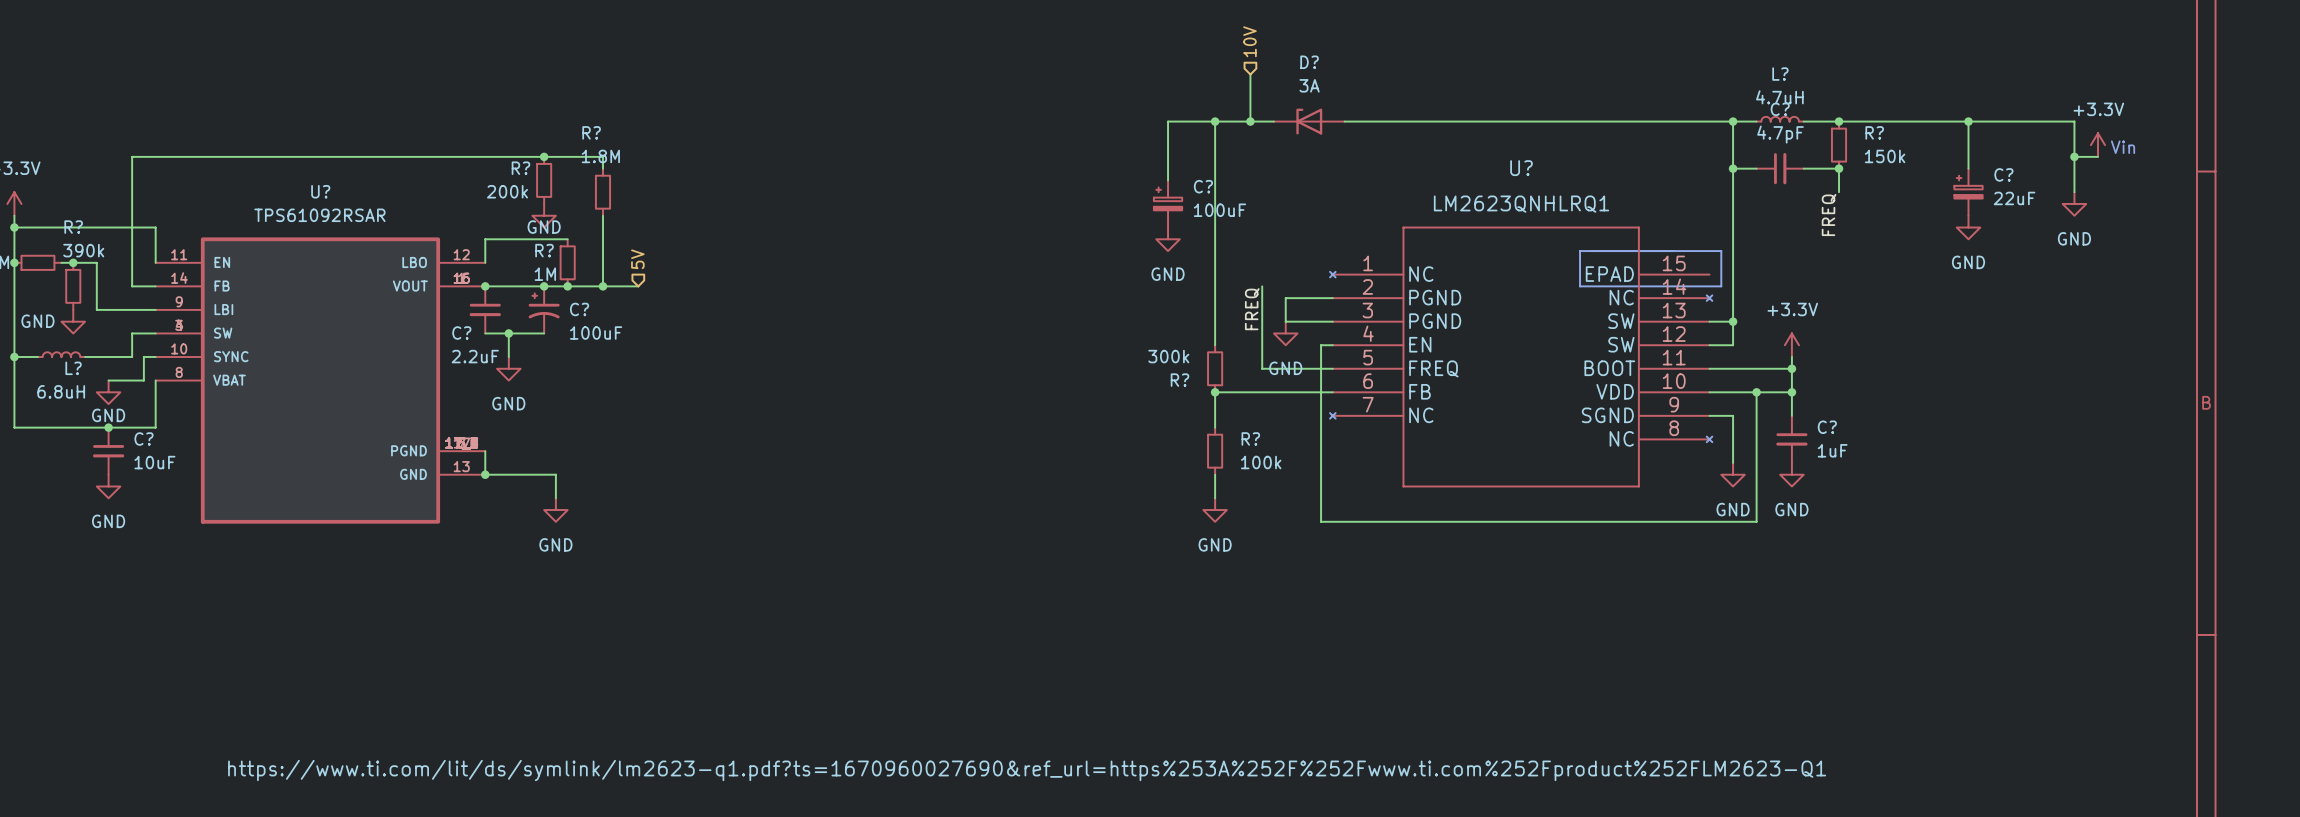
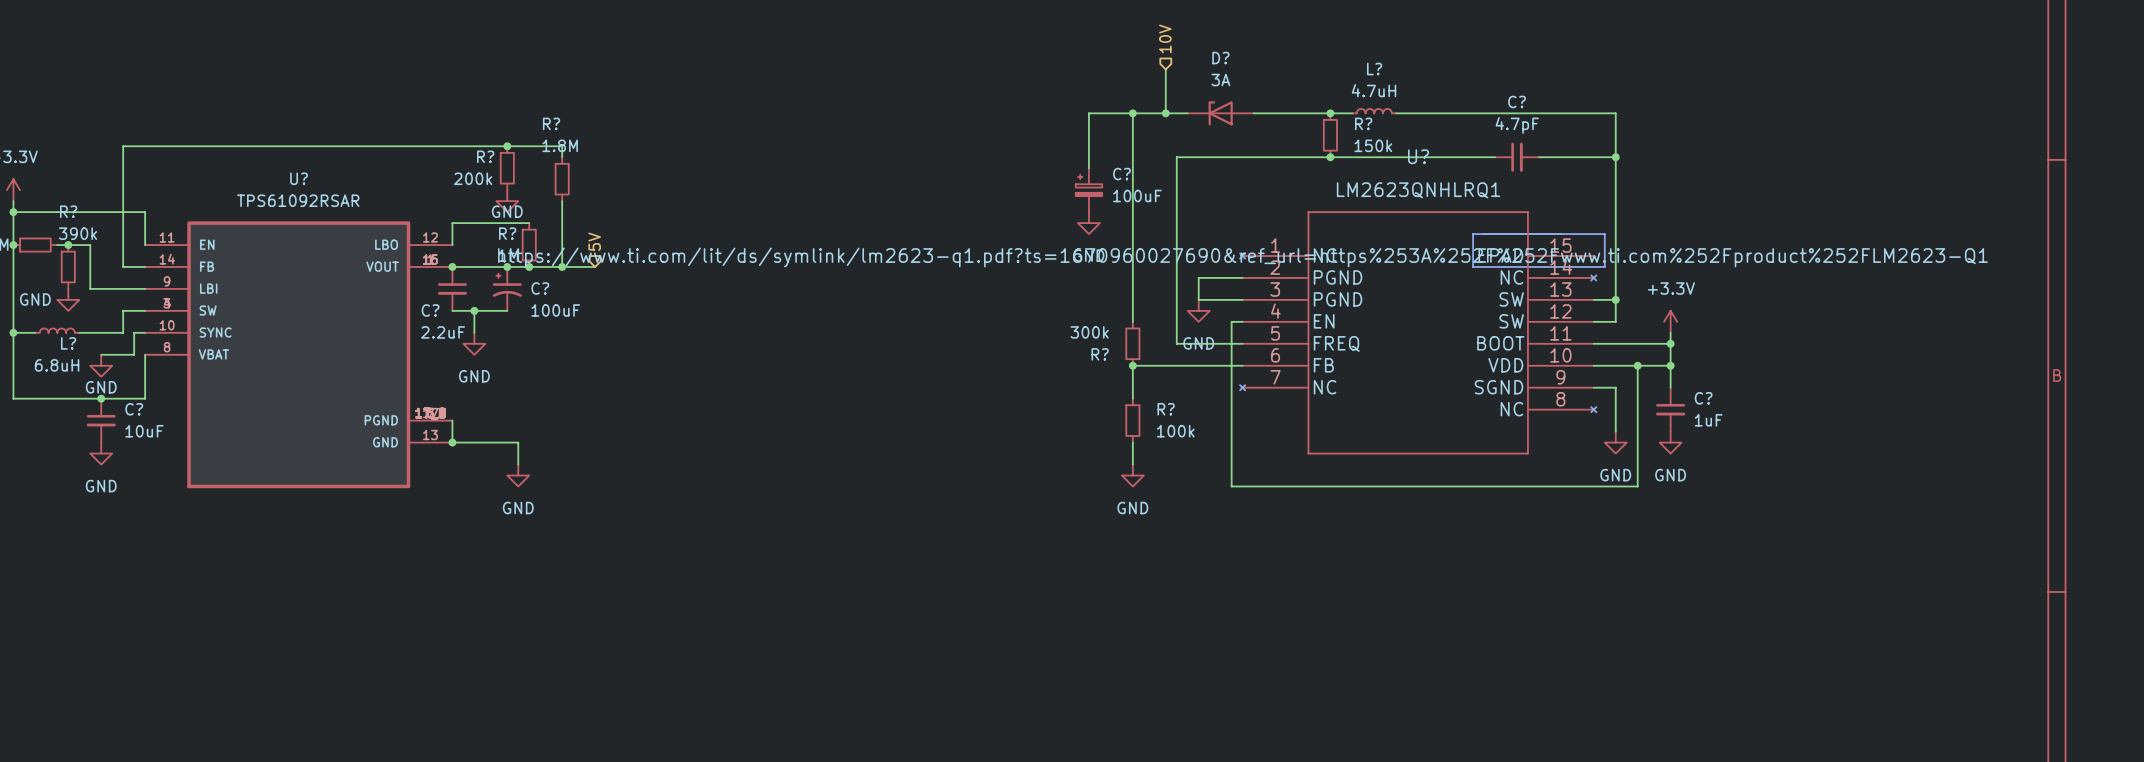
L?: none -> 4.7uH (1374, 111)
L?: 4.7uH (1780, 119) -> none
junction: none -> (1330, 113)
wire: (1450, 121) (1497, 121) -> none
wire: (1733, 121) (1756, 121) -> none
junction: (1733, 121) -> none
wire: (1803, 121) (2074, 121) (2074, 192) -> none
junction: (1839, 121) -> none
wire: (1968, 121) (1968, 168) -> none
junction: (1968, 121) -> none
R?: none -> 150k (1330, 135)
R?: 150k (1839, 145) -> none
power symbol: +3.3V (2097, 145) -> none
text: Vin (2123, 147) -> none
wire: (2074, 156) (2097, 156) -> none
junction: (2074, 156) -> none
junction: none -> (1330, 157)
wire: none -> (1495, 157) (1176, 157) (1176, 266)
wire: (1733, 168) (1756, 168) -> (1615, 157) (1538, 157)
C? position: (1780, 168) -> (1516, 157)
wire: (1803, 168) (1839, 168) (1839, 192) -> none
junction: (1839, 168) -> none
C?: 22uF (1968, 192) -> none
power symbol: GND (2074, 203) -> none
label: FREQ (1829, 214) -> none
power symbol: GND (1968, 227) -> none
label: FREQ (1252, 309) -> none
U? text position: https://www.ti.com/lit/ds/symlink/lm2623-q1.pdf?ts=1670960027690&ref_url=https%253A%252F%252Fwww.ti.com%252Fproduct%252FLM2623-Q1 (1027, 770) -> https://www.ti.com/lit/ds/symlink/lm2623-q1.pdf?ts=1670960027690&ref_url=https%253A%252F%252Fwww.ti.com%252Fproduct%252FLM2623-Q1 (1242, 257)

